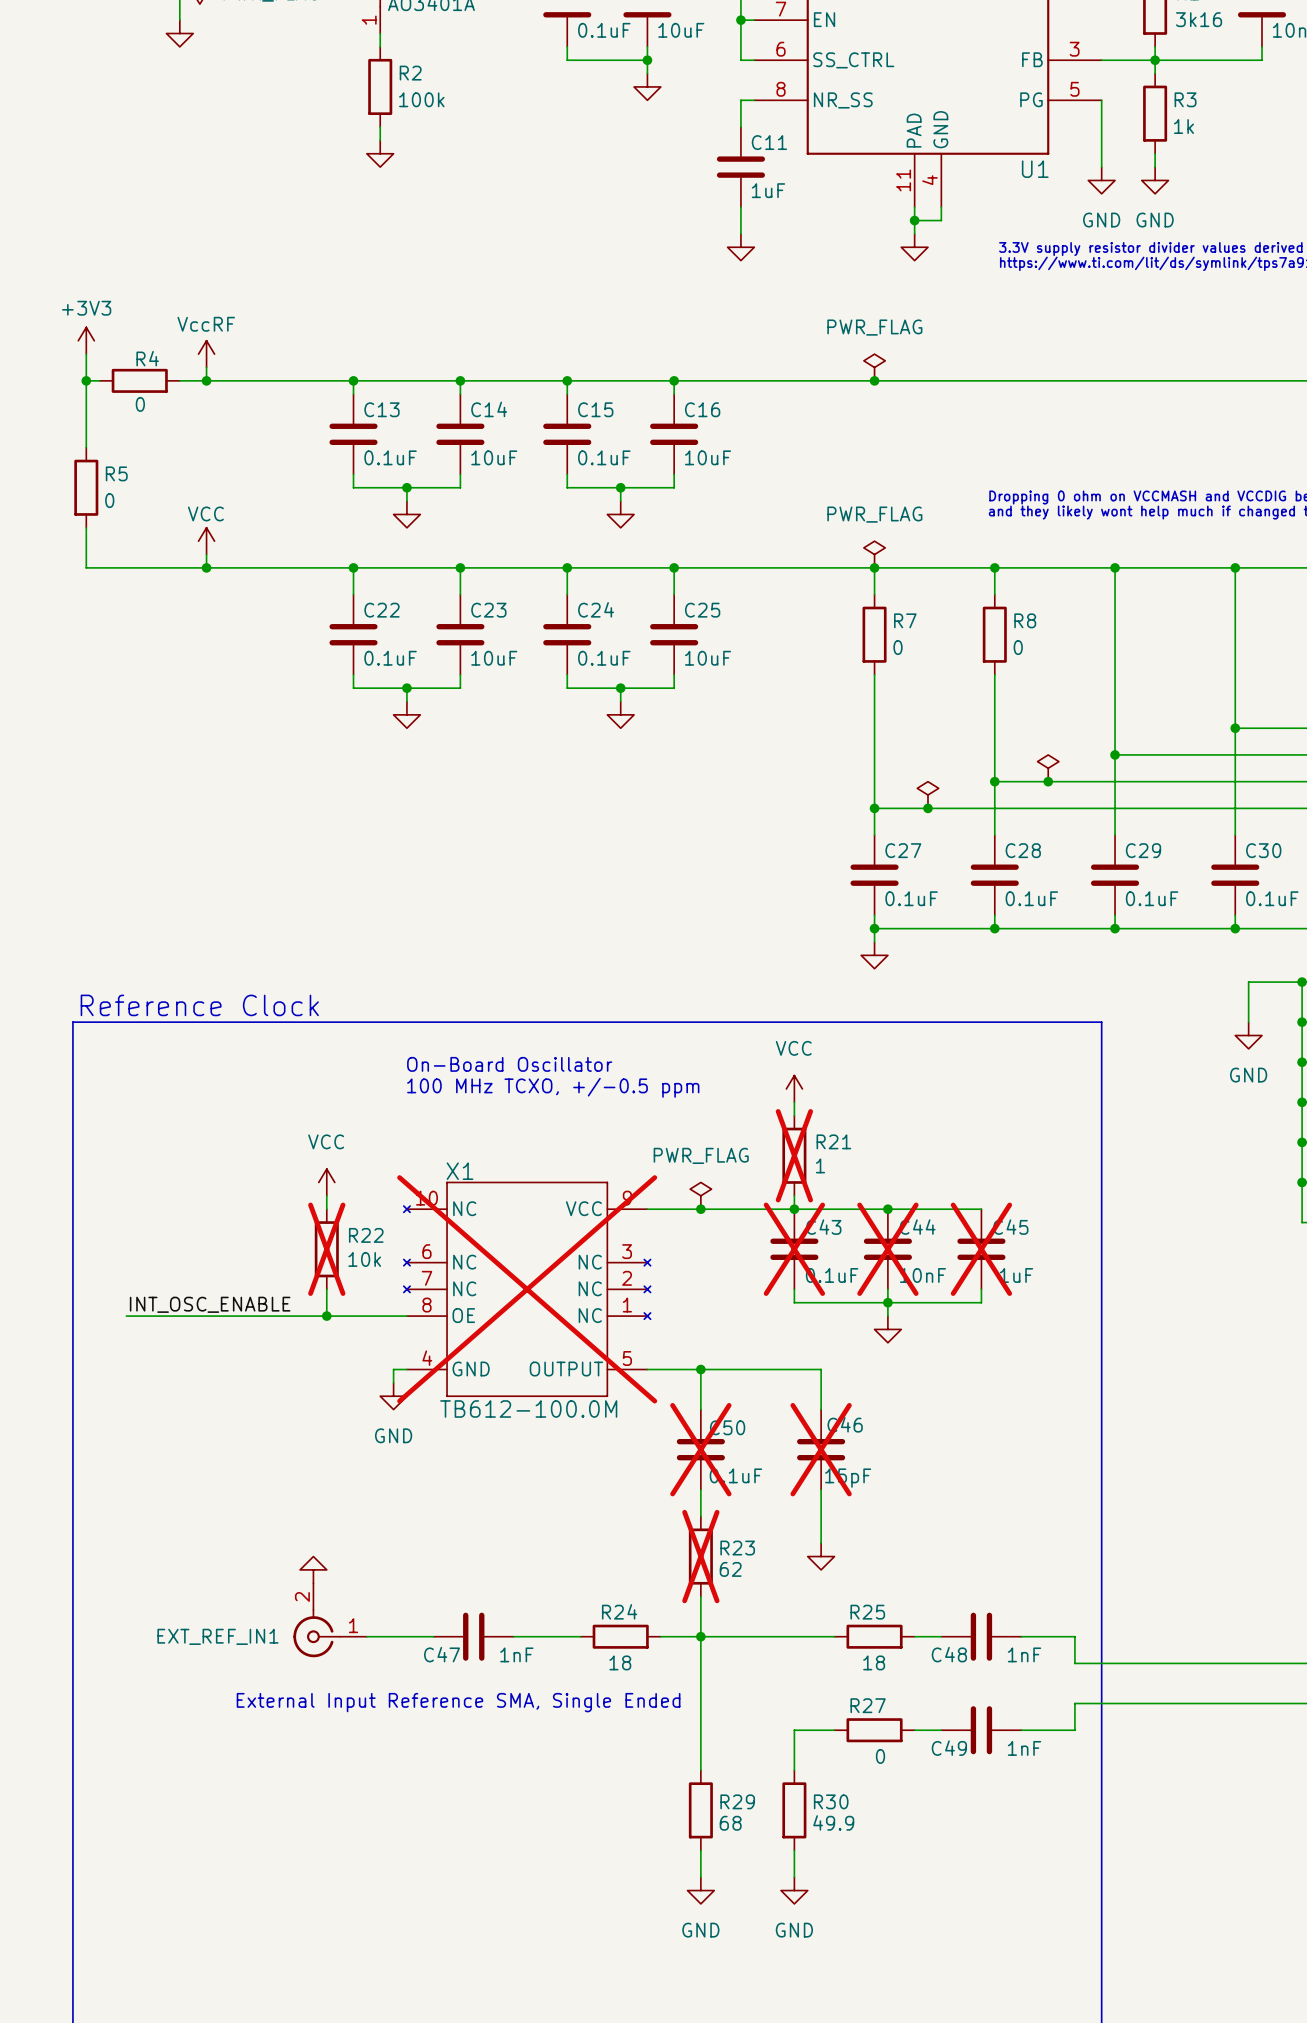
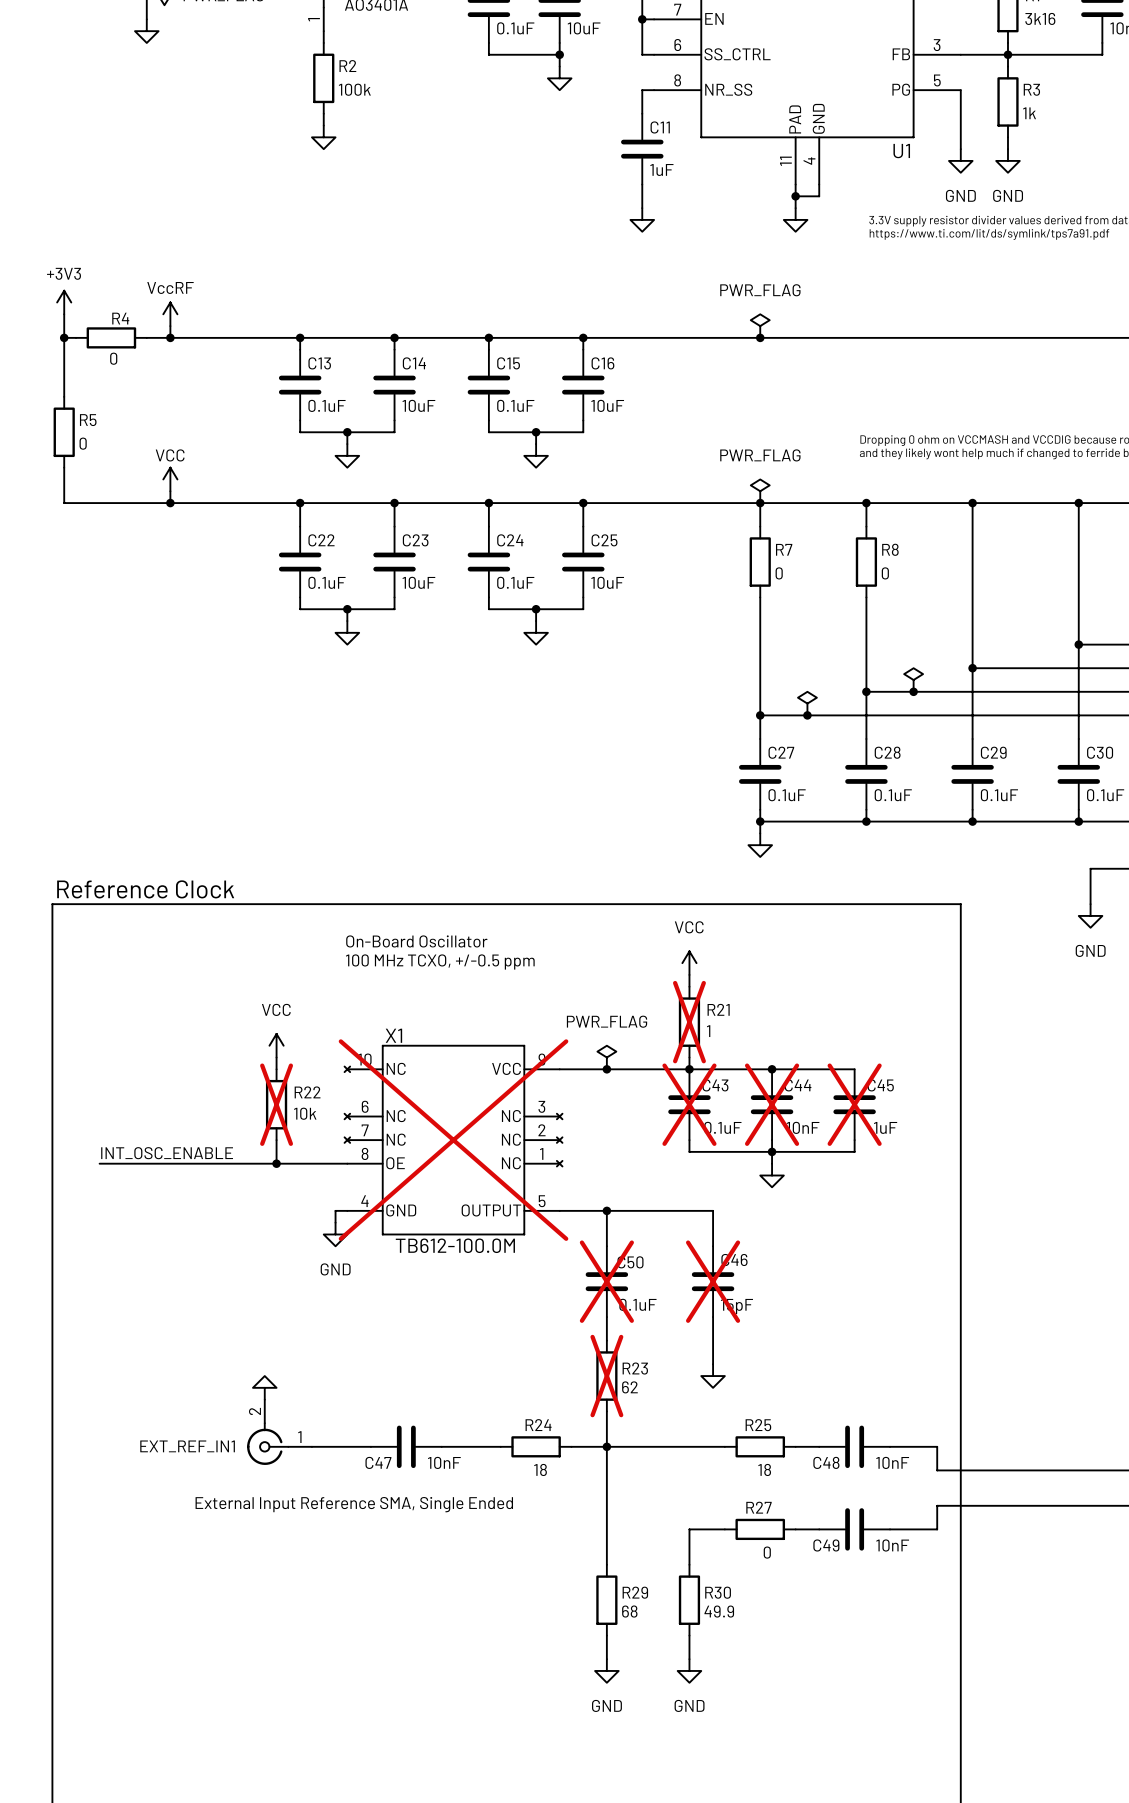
C47 value: 1nF (516, 1654) -> 10nF (444, 1462)
C48 value: 1nF (1024, 1654) -> 10nF (892, 1462)
C49 value: 1nF (1024, 1748) -> 10nF (892, 1545)

